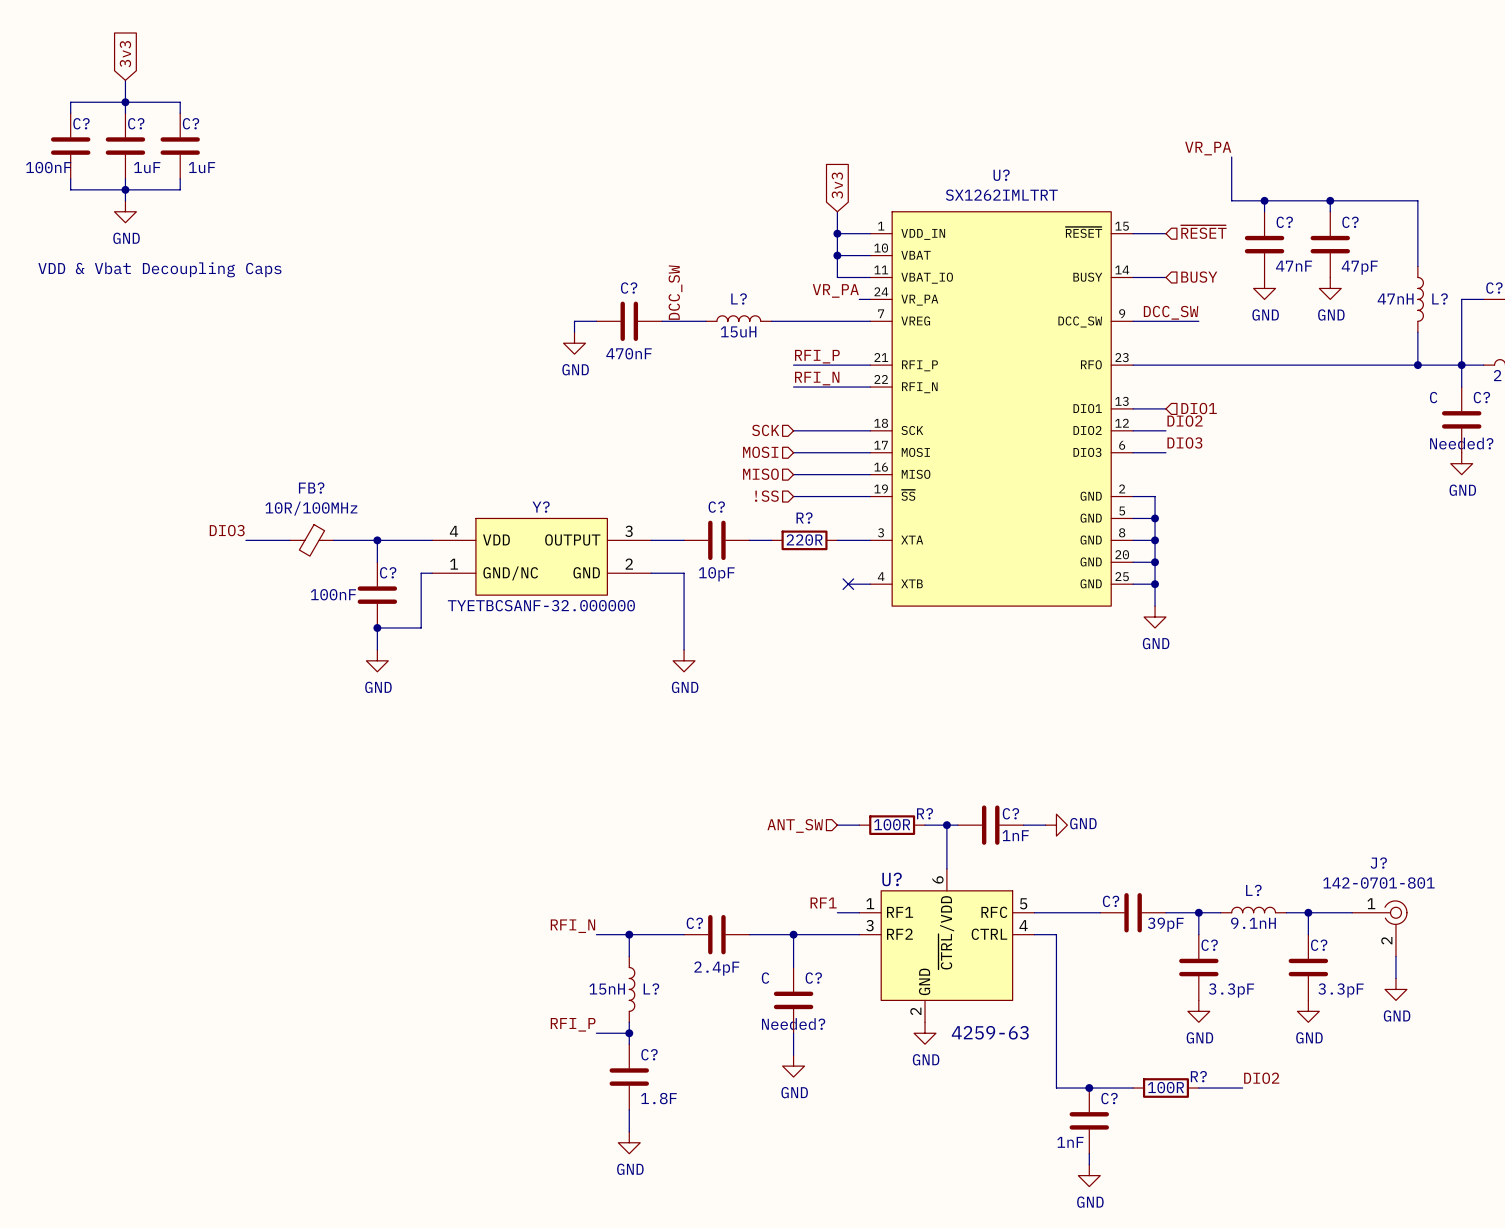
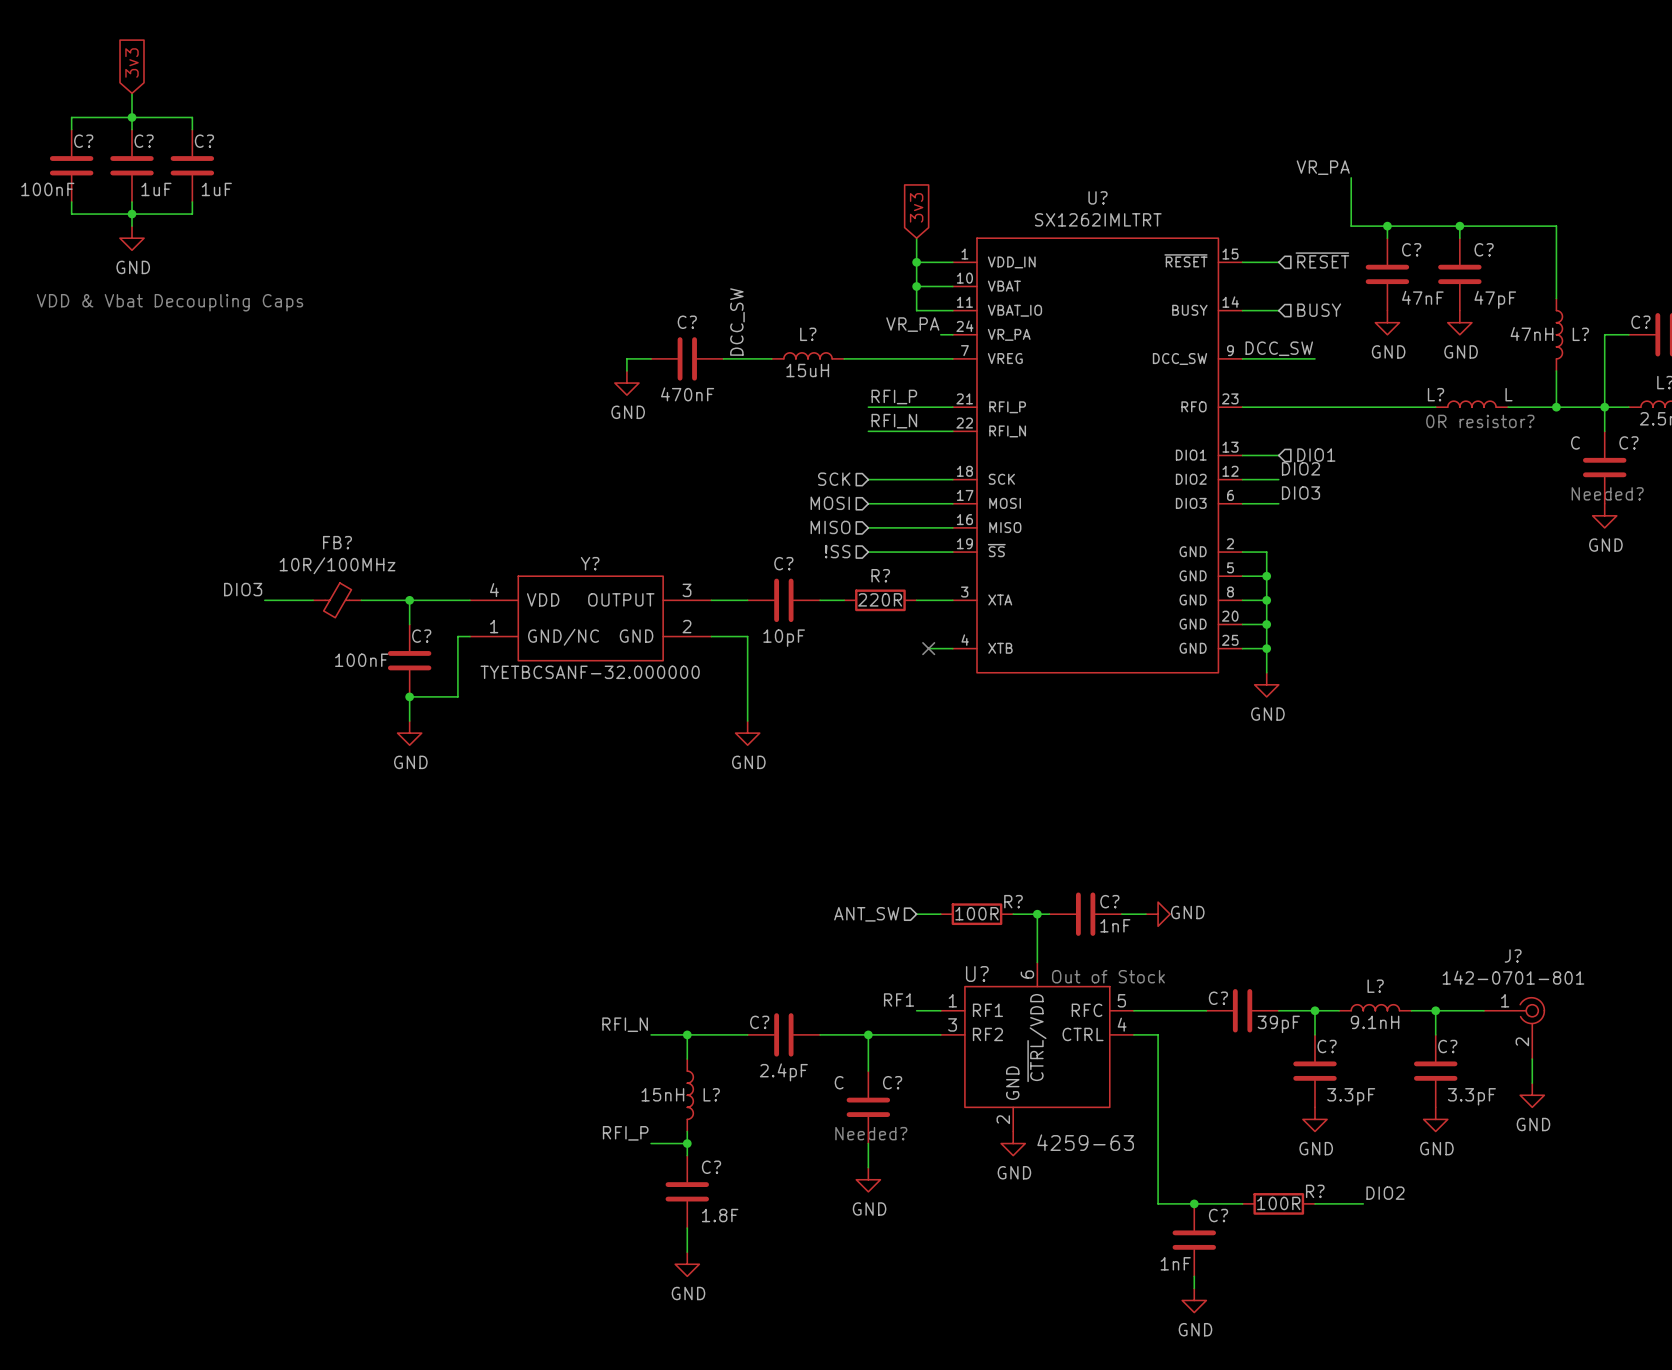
L?: none -> L (1471, 404)
wire: (1308, 365) (1374, 365) -> none
text: none -> 0R resistor? (1480, 421)
text: none -> Out of Stock (1108, 976)

